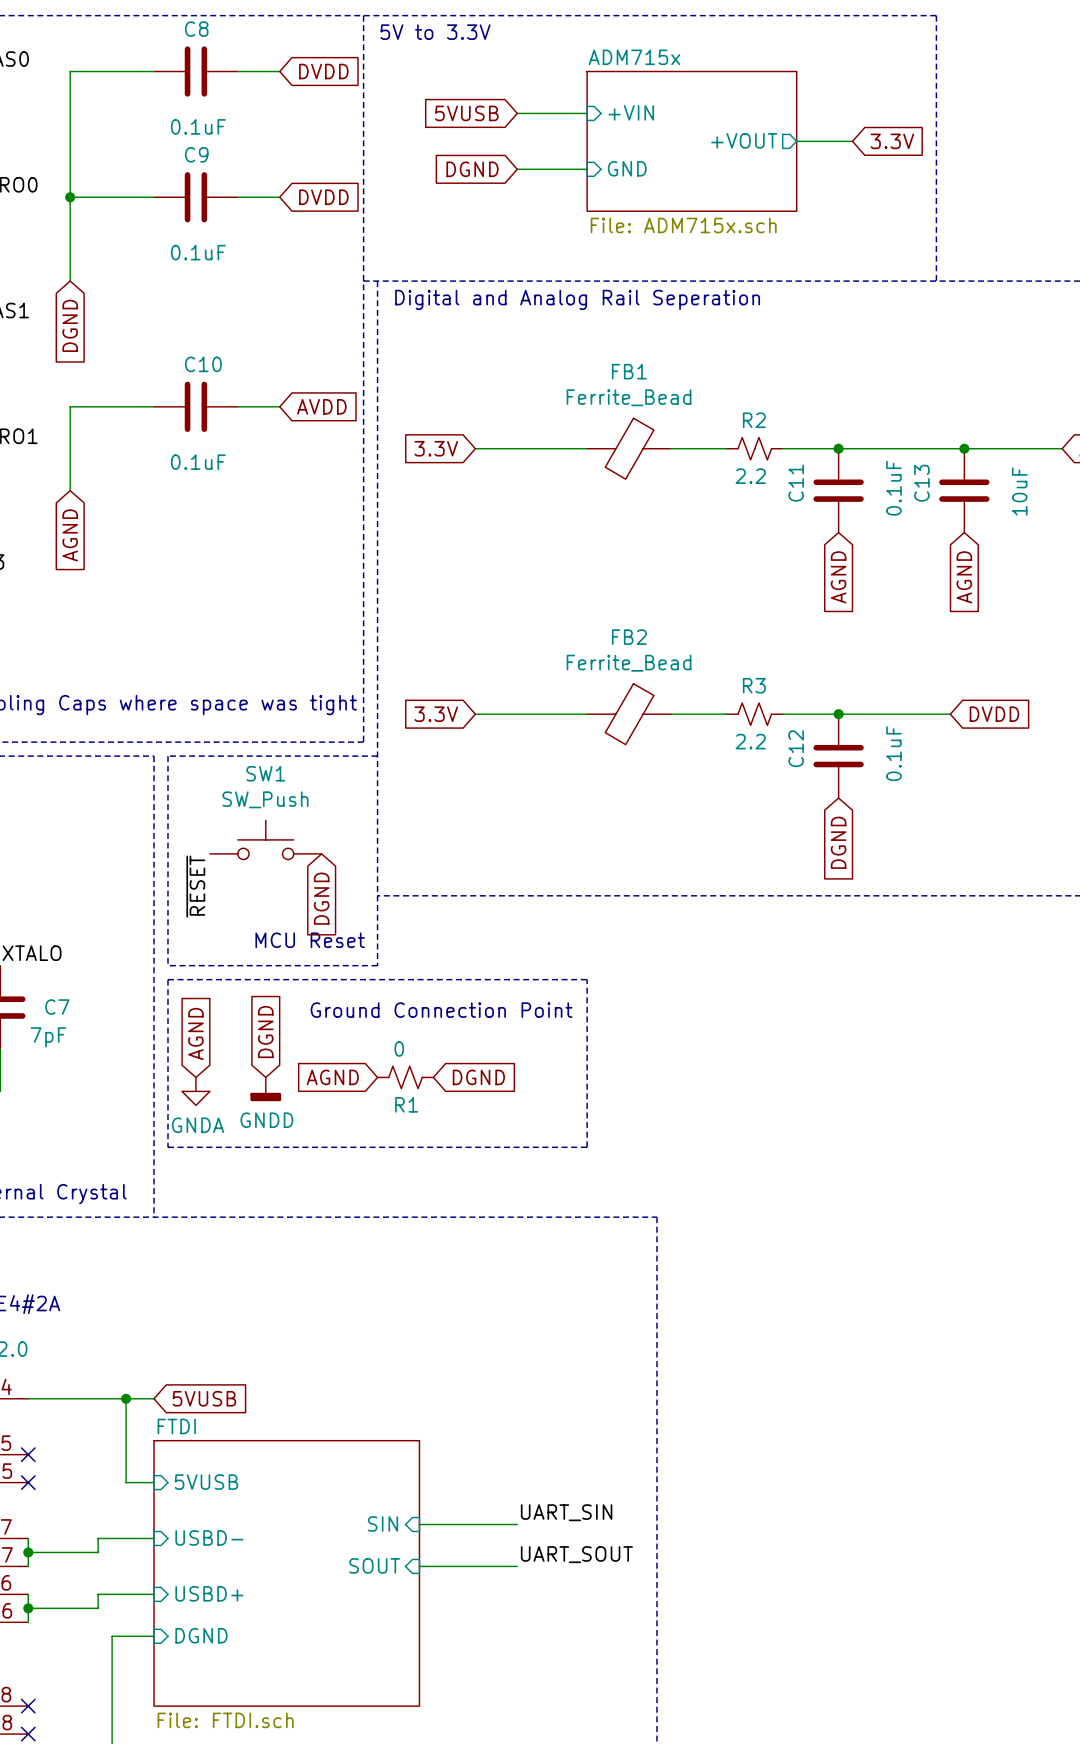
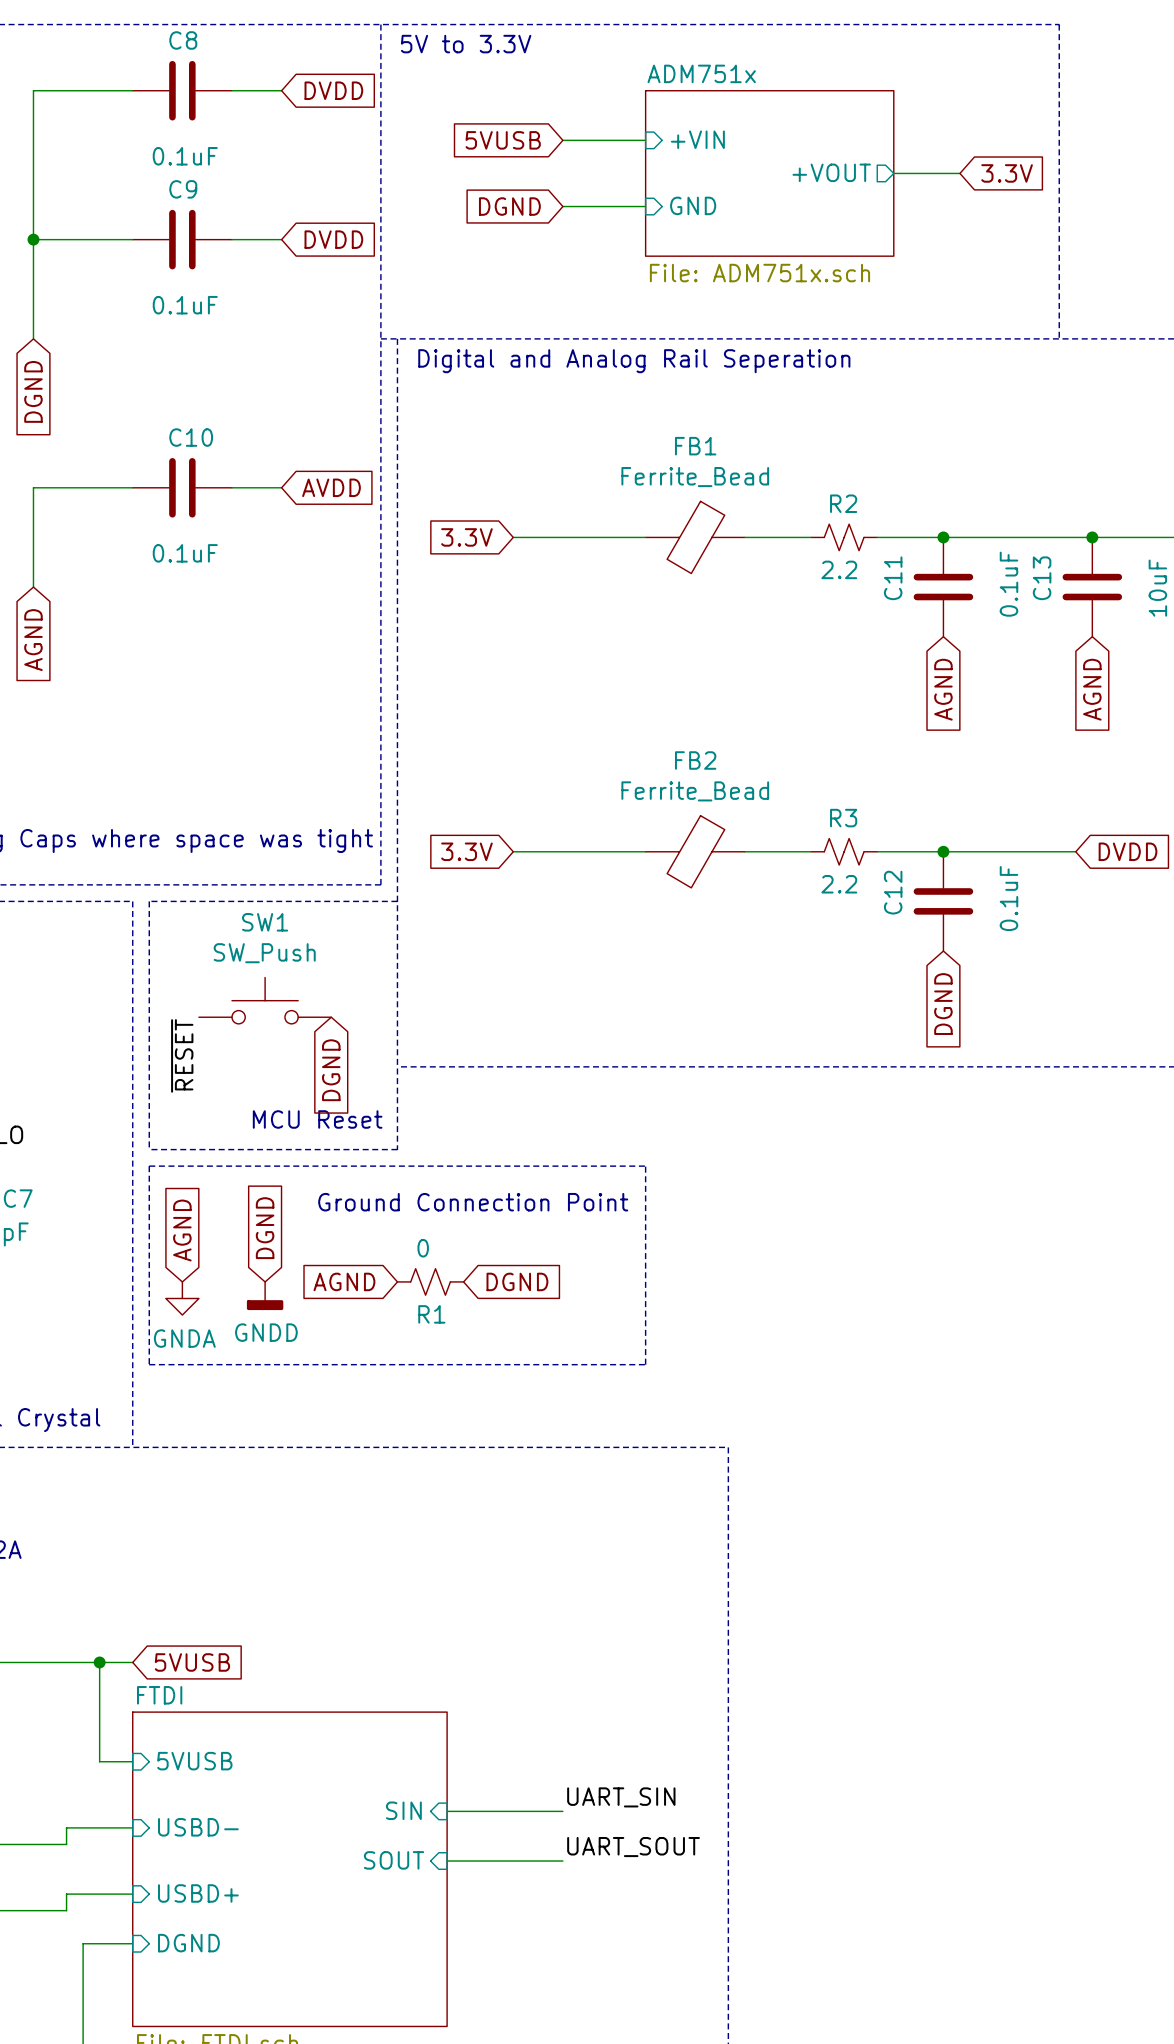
sheet ADM715x name: ADM715x (634, 57) -> ADM751x (701, 73)
sheet ADM715x value: File: ADM715x.sch (683, 225) -> File: ADM751x.sch (759, 273)

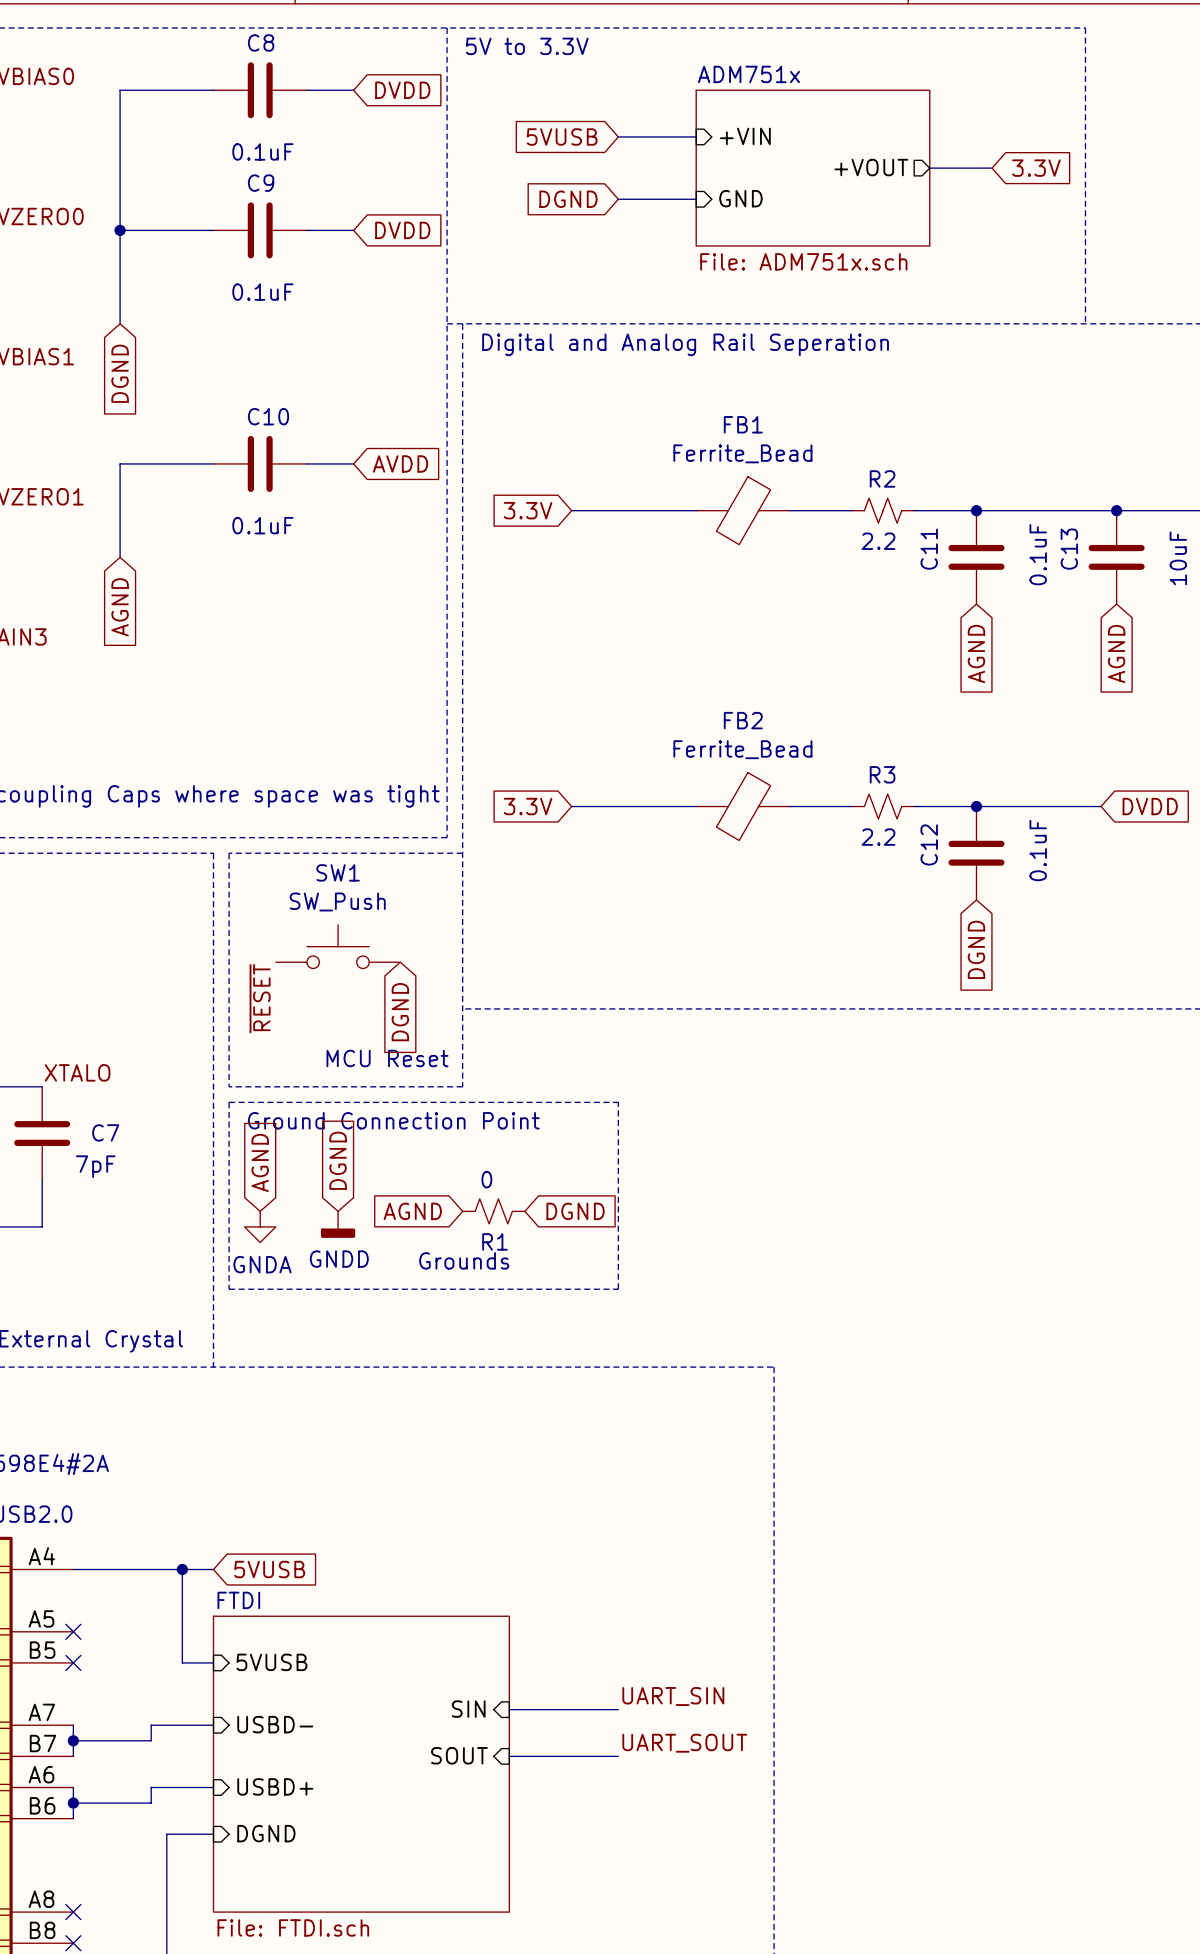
line: (562, 1166) (645, 1166) (645, 1364) (562, 1364) -> (618, 1102) (618, 1289)
text position: Ground Connection Point (473, 1202) -> Ground Connection Point (393, 1120)
text: none -> Grounds (464, 1260)

